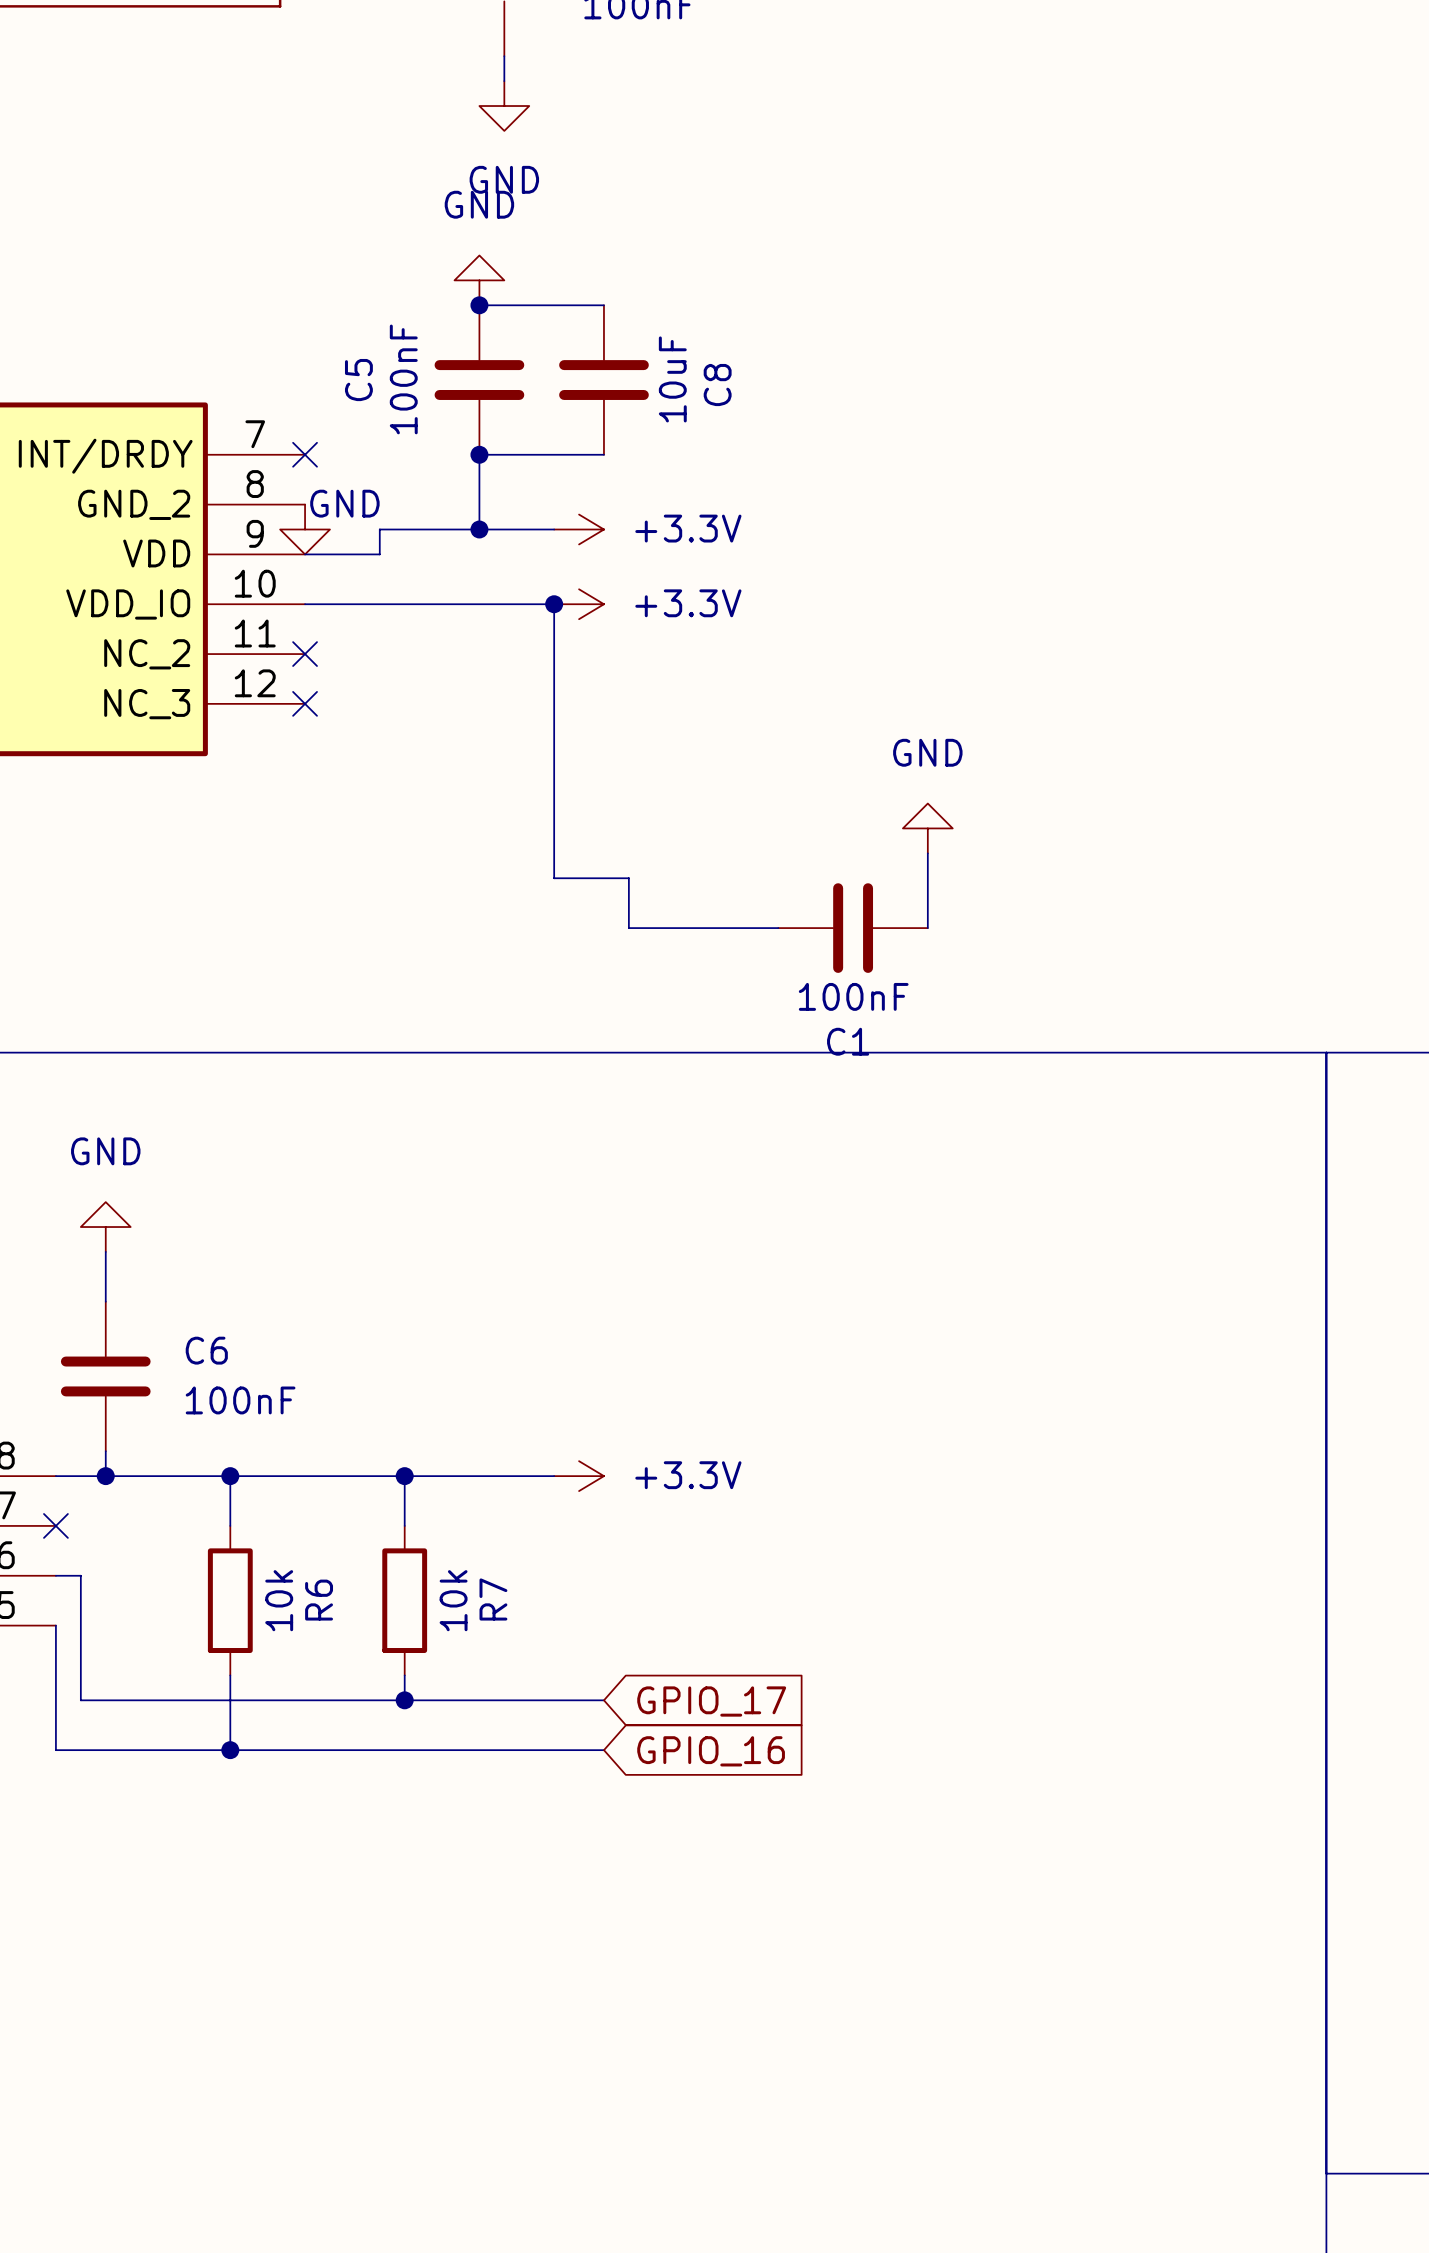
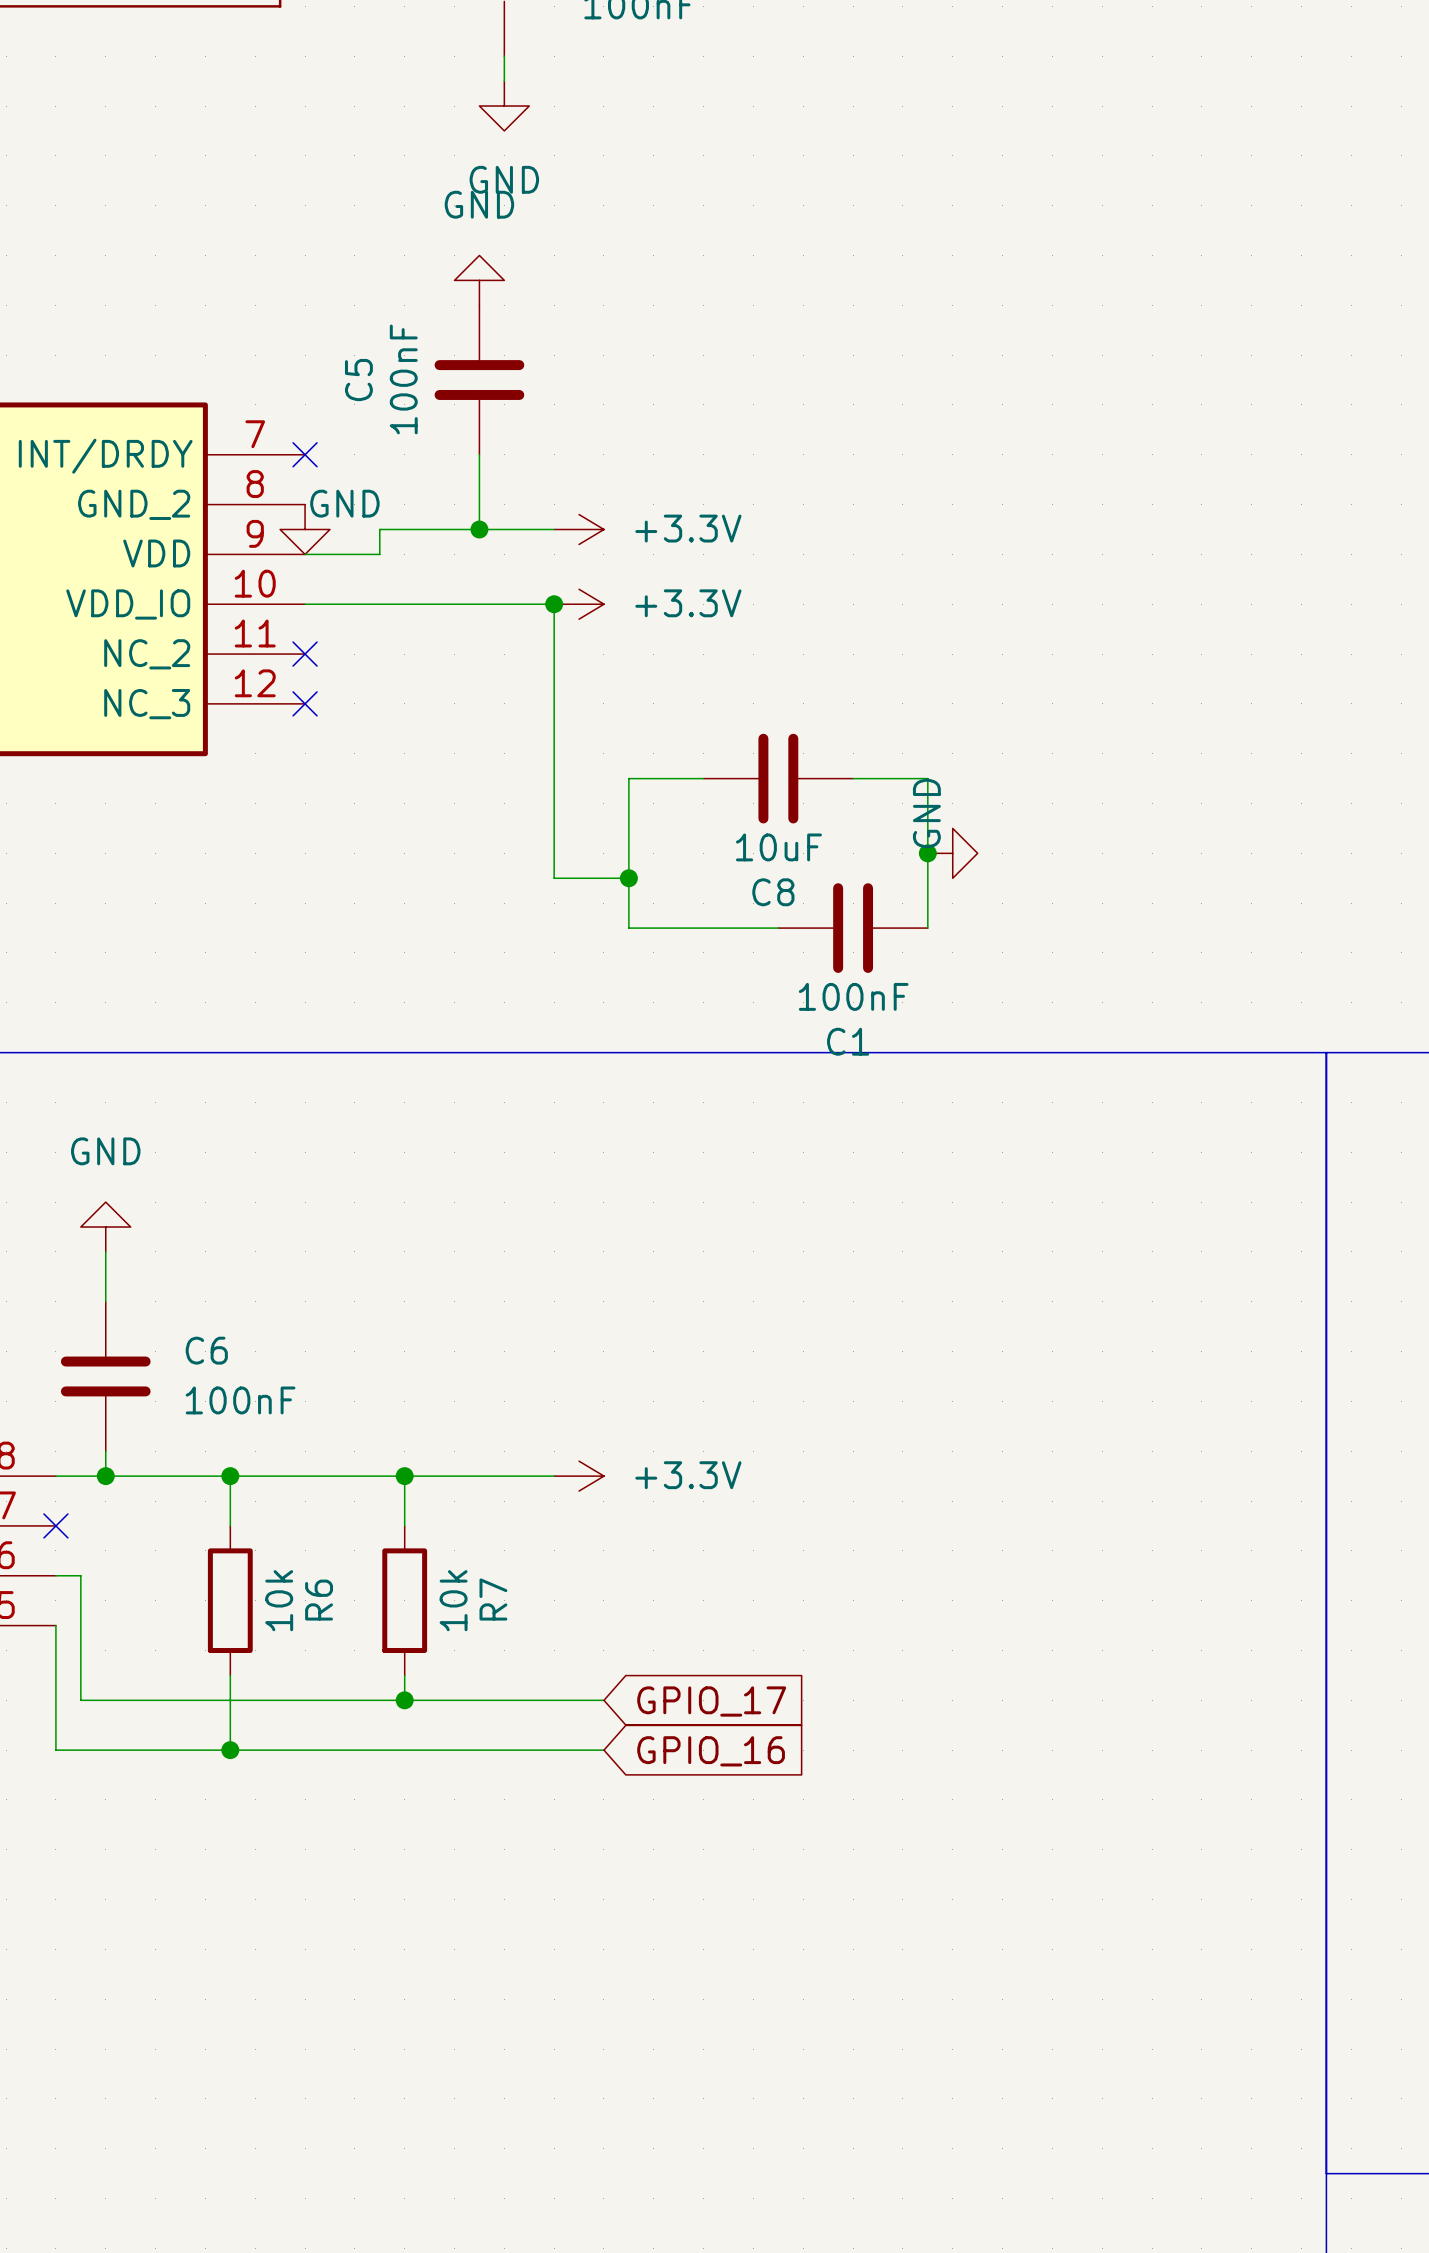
wire: (479, 305) (603, 305) -> none
junction: (479, 305) -> none
C8 rotation: 0° (603, 380) -> 90° clockwise (778, 778)
C8 position: (603, 380) -> (778, 778)
wire: (479, 454) (603, 454) -> none
junction: (479, 454) -> none
power symbol text position: GND (927, 752) -> GND (926, 813)
wire: none -> (703, 778) (628, 778) (628, 878)
wire: none -> (853, 778) (927, 778) (927, 853)
power symbol rotation: 0° (927, 828) -> 90° clockwise (952, 853)
power symbol position: GND (927, 828) -> GND (952, 853)
junction: none -> (927, 853)
junction: none -> (628, 878)

